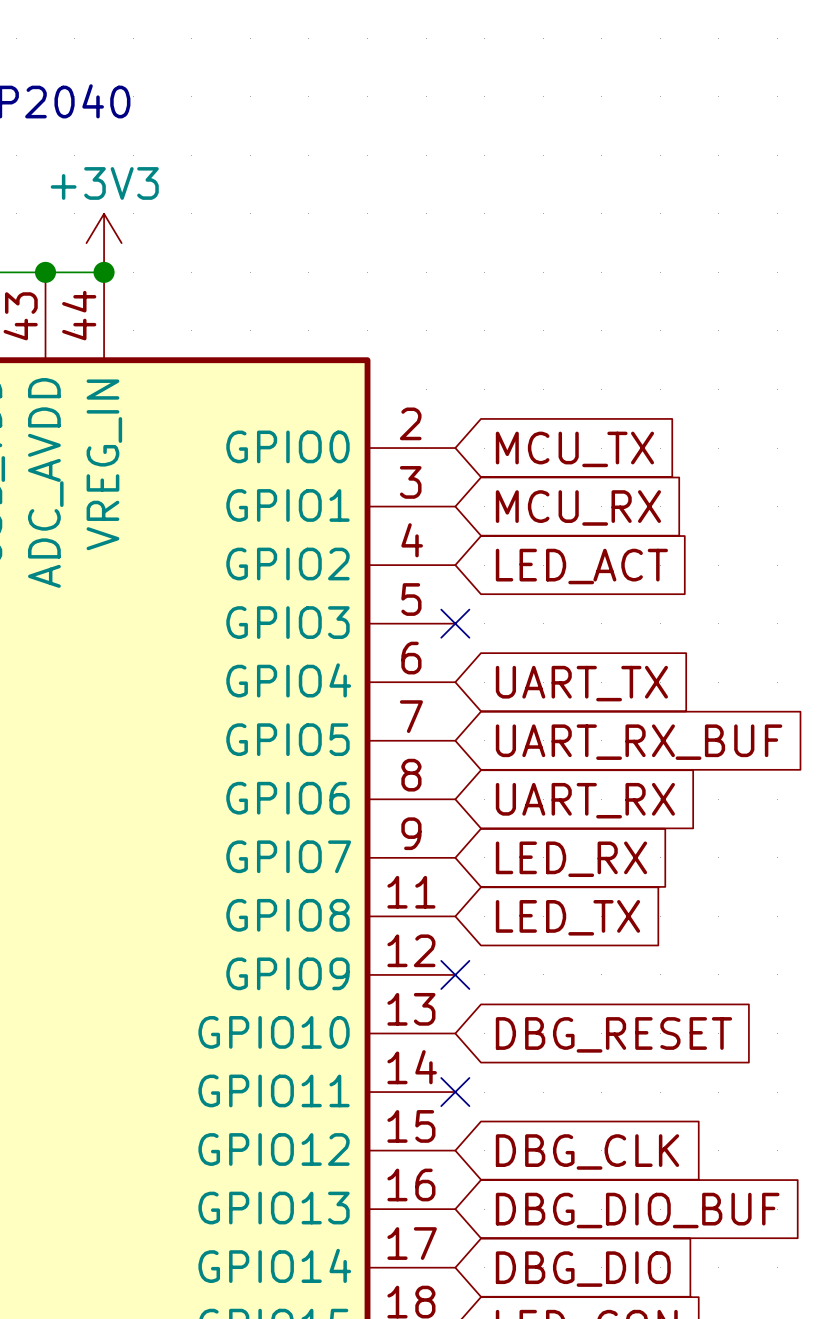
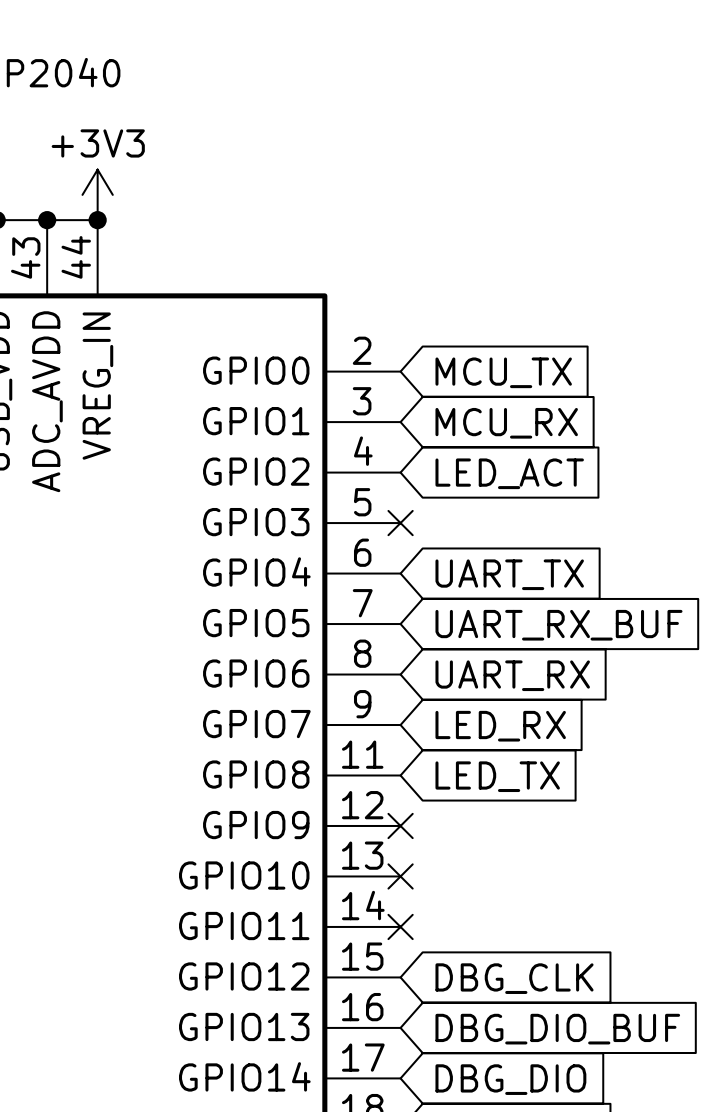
no-connect mark: none -> (400, 876)
global label: DBG_RESET (613, 1034) -> none

